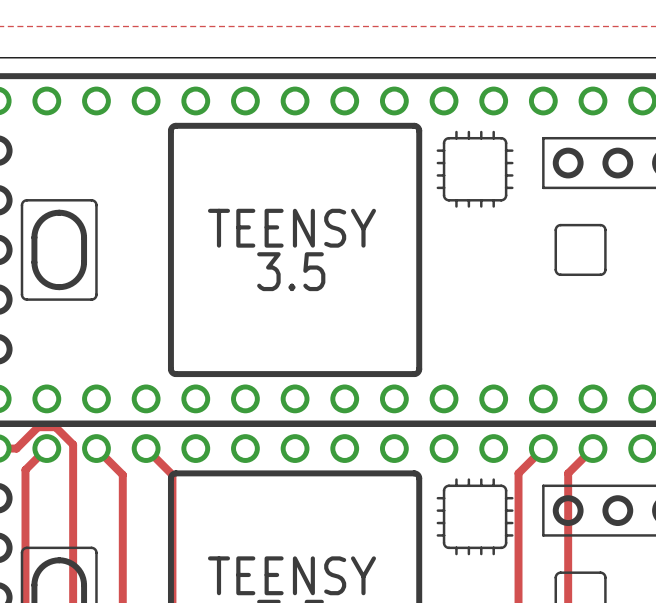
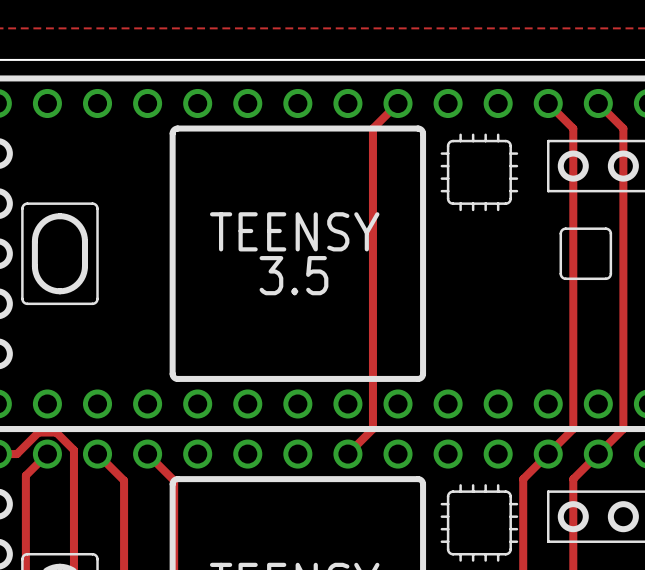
track: none -> (398, 103) (372, 128) (372, 429) (347, 454)
track: none -> (548, 103) (573, 128) (573, 429) (548, 454)
track: none -> (598, 103) (623, 128) (623, 429) (598, 454)

